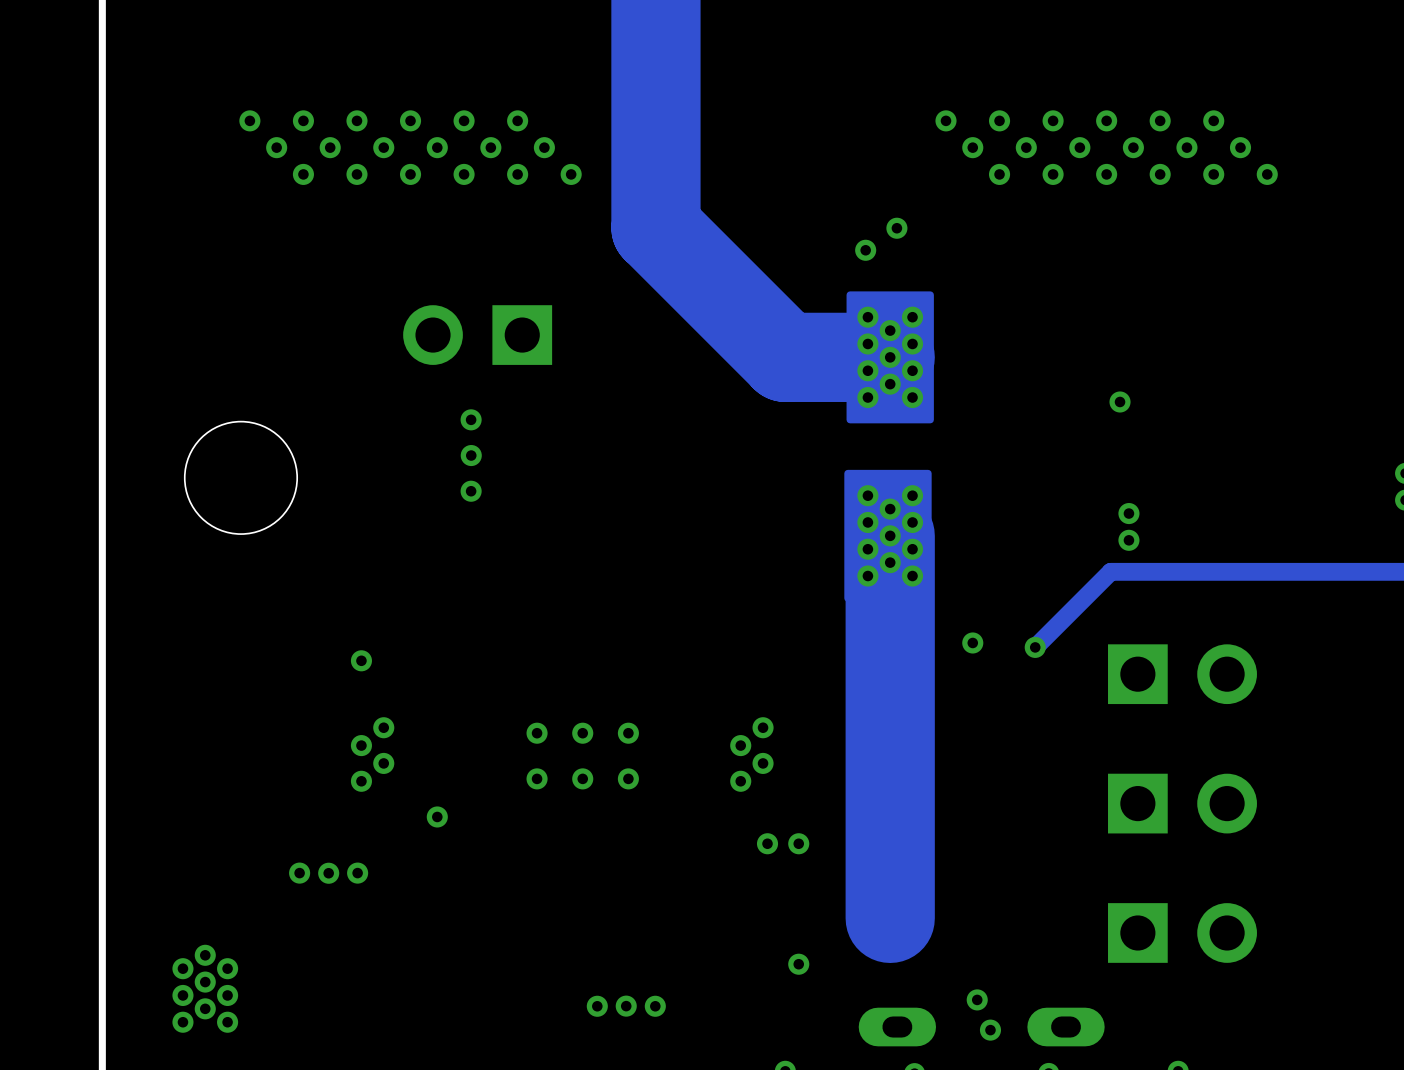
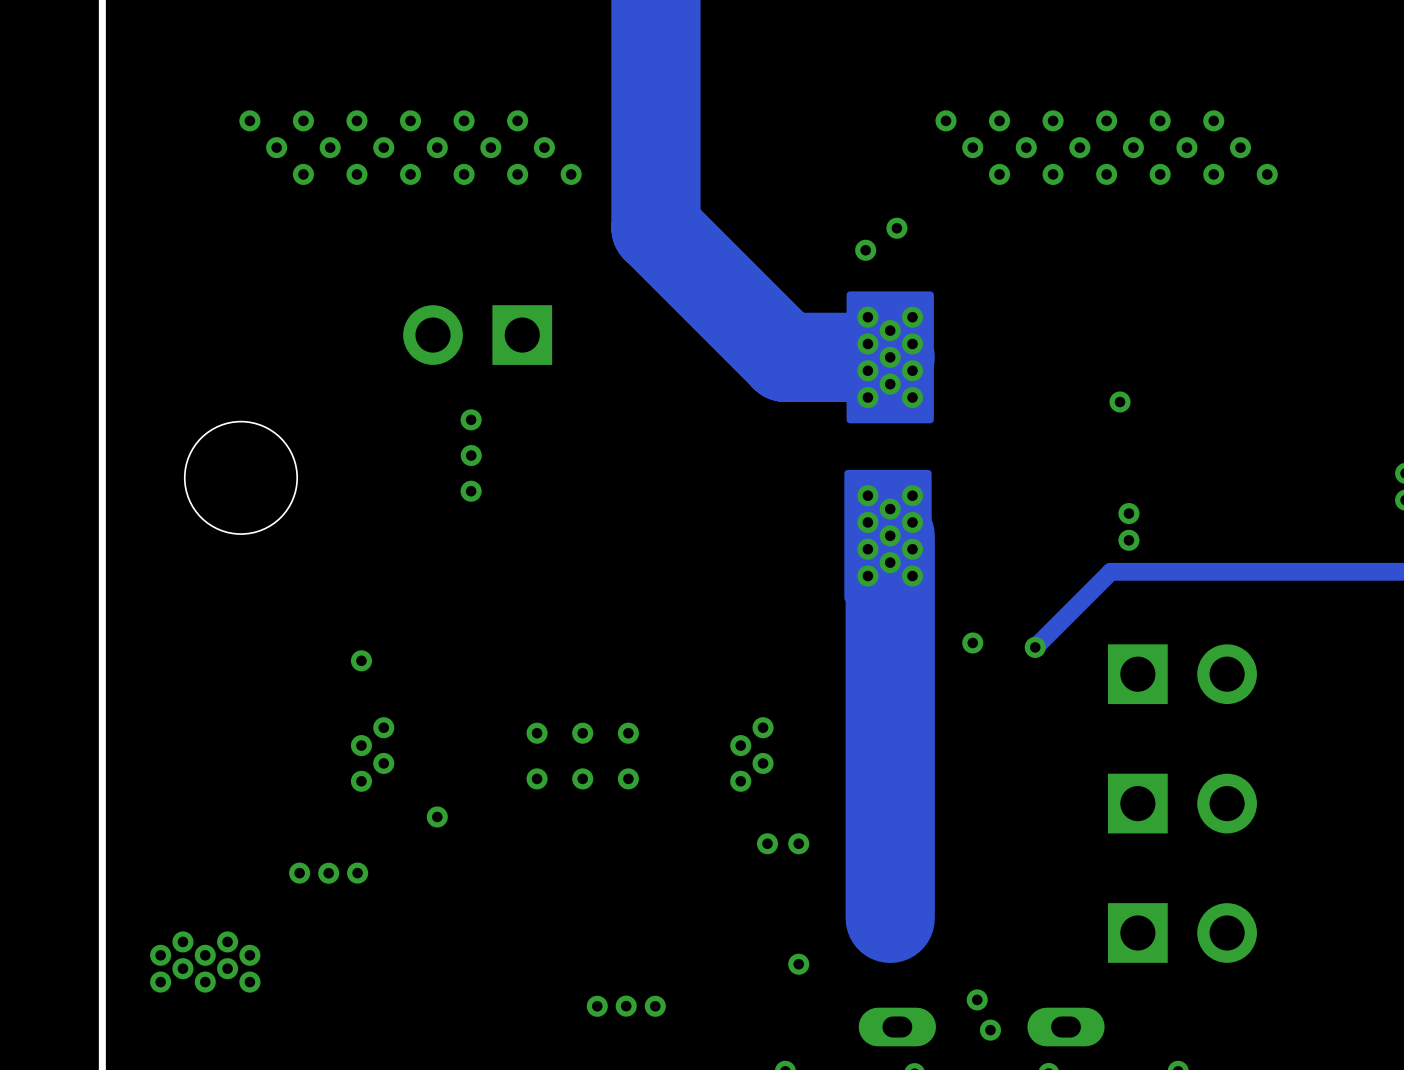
via: none -> (182, 941)
via: none -> (227, 941)
via: none -> (160, 955)
via: none -> (249, 955)
via: none -> (160, 982)
via: none -> (249, 982)
via: (182, 995) -> none
via: (227, 995) -> none
via: (205, 1008) -> none
via: (182, 1022) -> none
via: (227, 1022) -> none

